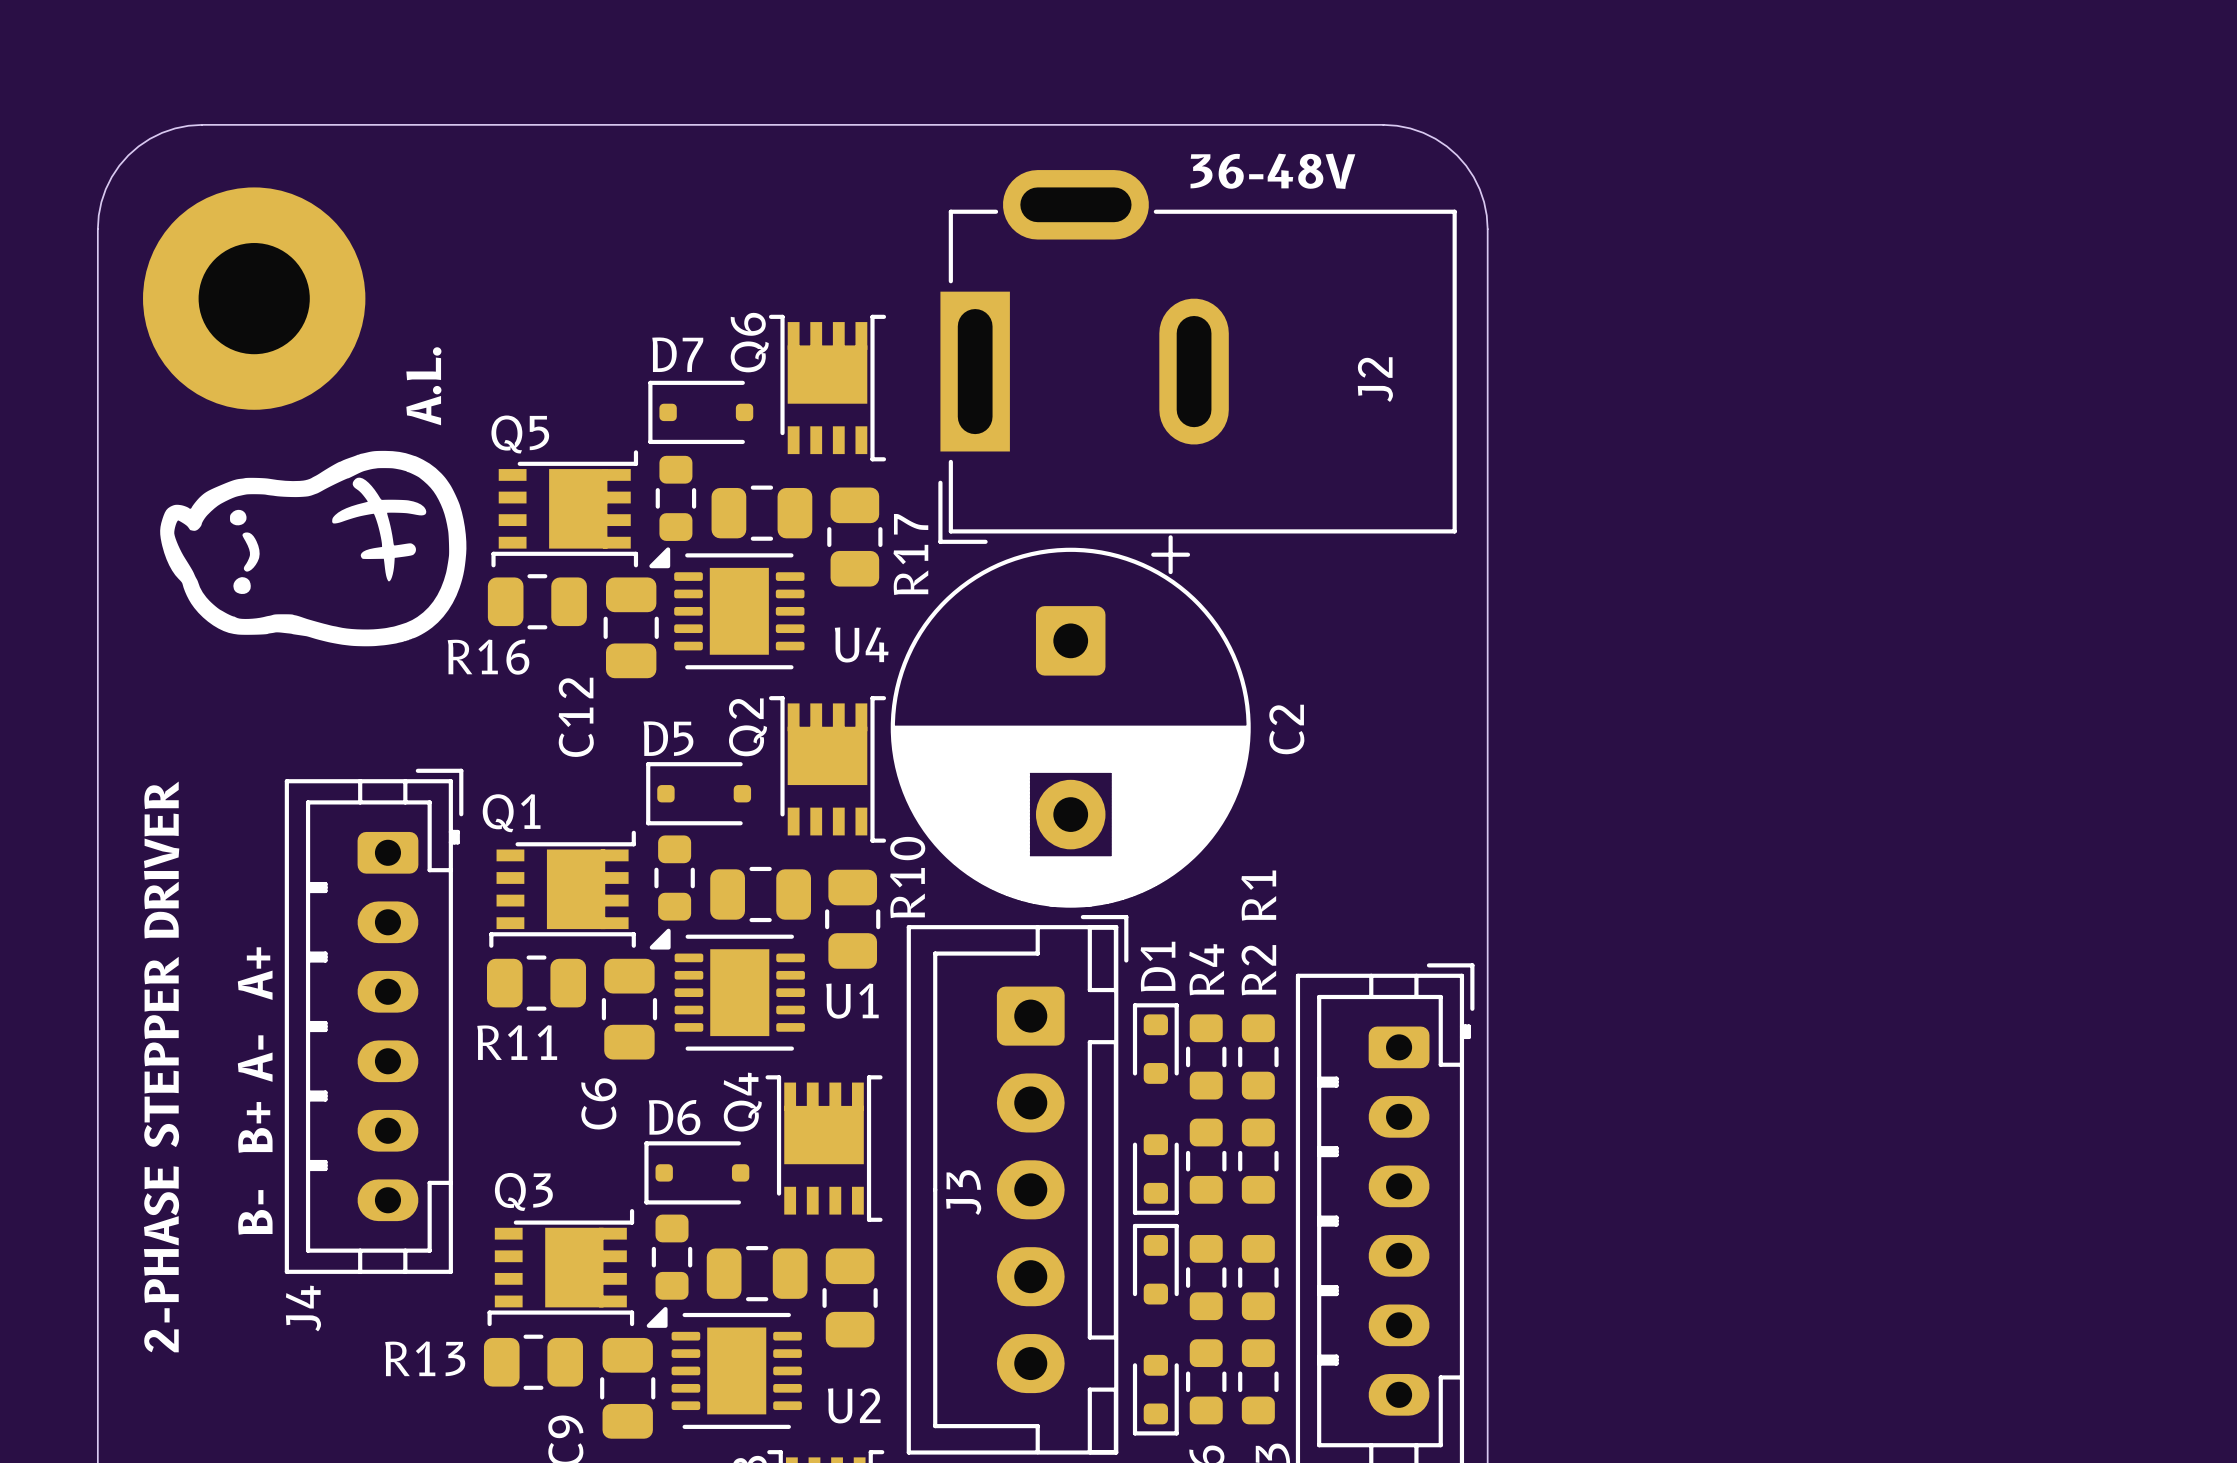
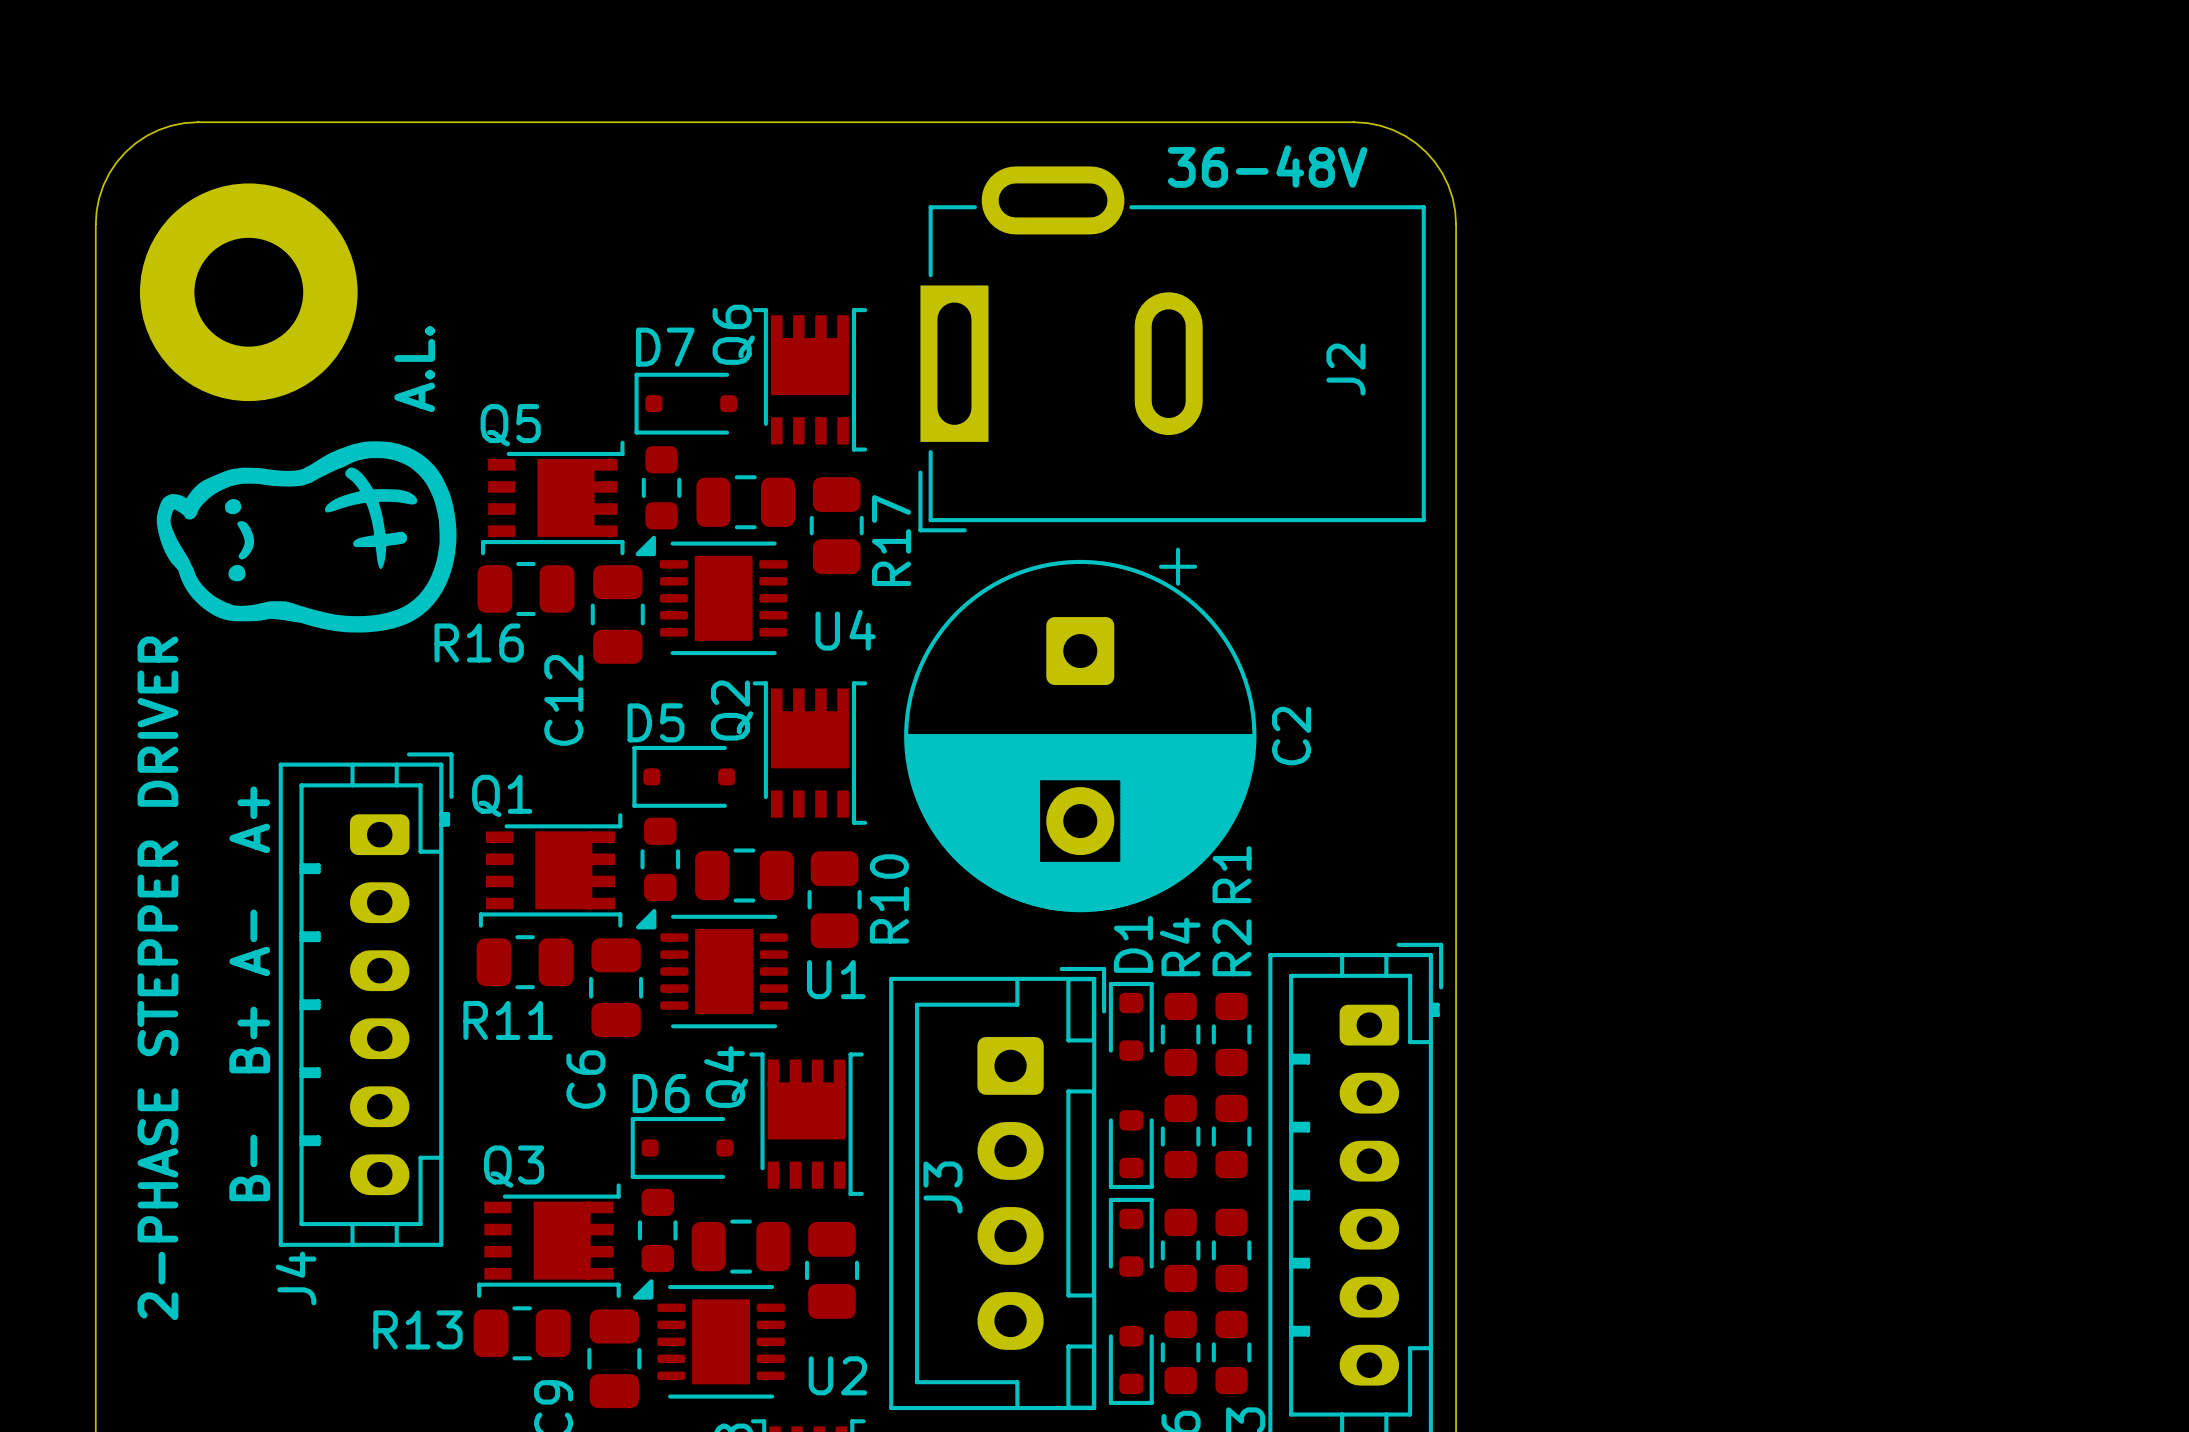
C2 position: (1070, 721) -> (1080, 729)
R10 name position: R10 (907, 877) -> R10 (889, 898)
J3 footprint: [906, 914, 1129, 1455] -> [889, 966, 1107, 1411]

